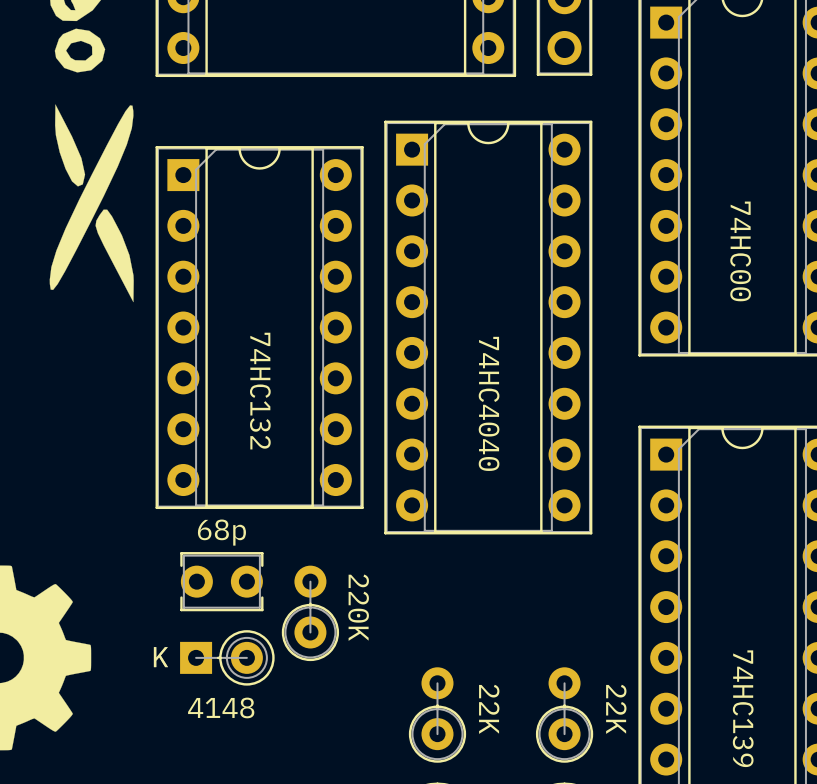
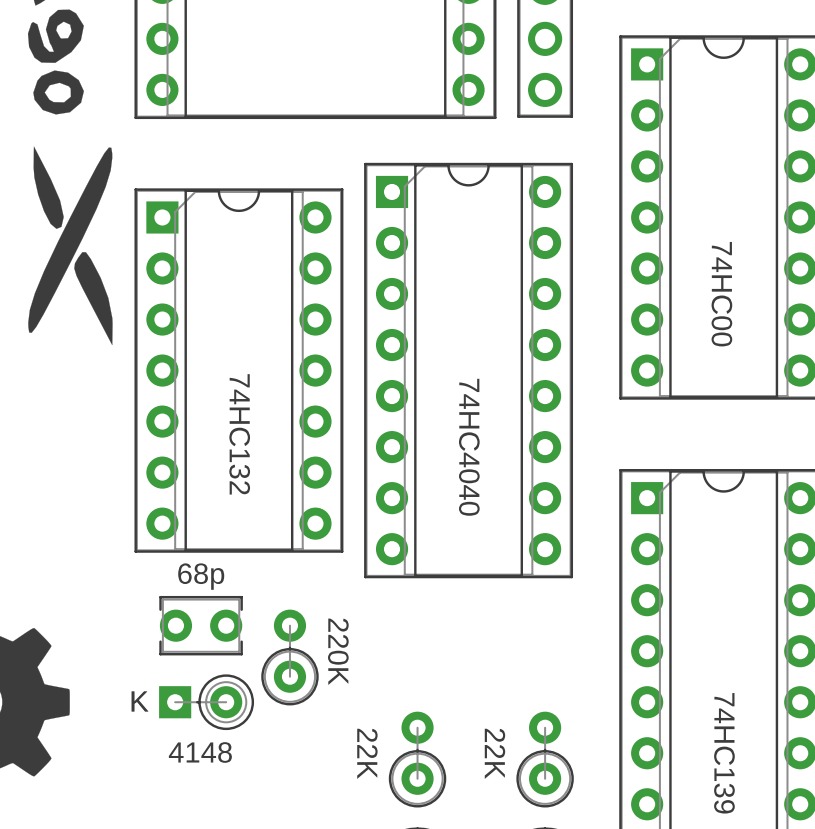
part value position: 22K (489, 709) -> 22K (367, 753)
part value position: 22K (616, 709) -> 22K (494, 753)

